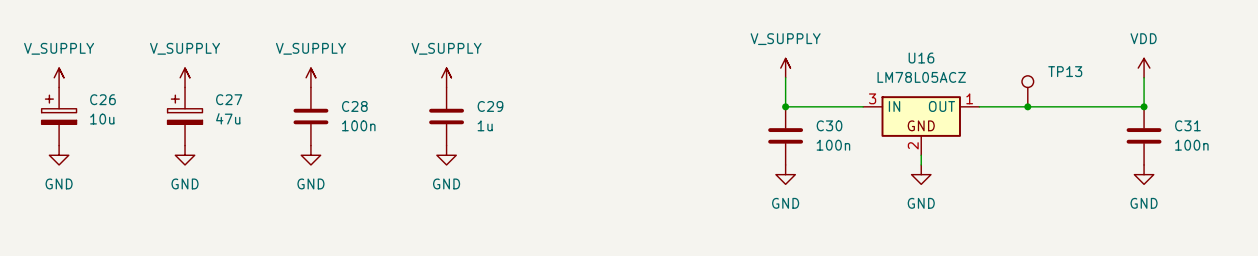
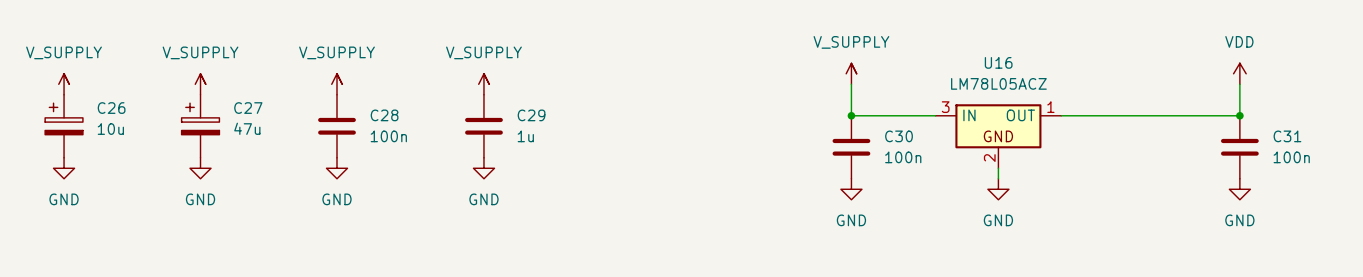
TP13: (1027, 91) -> none
junction: (1027, 106) -> none

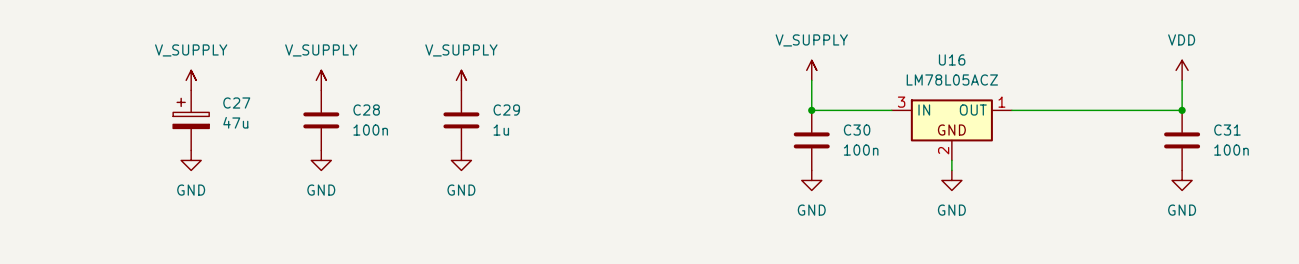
power symbol: V_SUPPLY (64, 84) -> none
C26: 10u (64, 126) -> none
power symbol: GND (64, 168) -> none

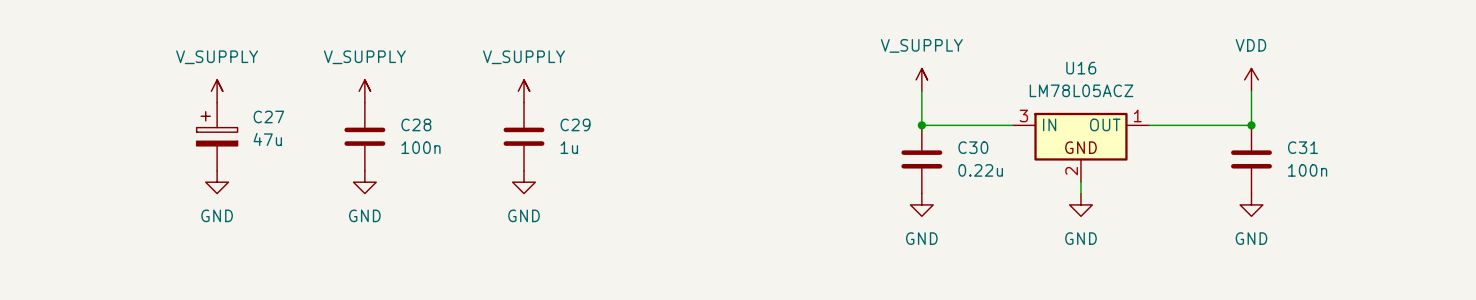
power symbol position: VDD (1182, 70) -> VDD (1251, 79)
wire: (1182, 80) (1182, 110) (1102, 110) -> (1251, 91) (1251, 125)
junction: none -> (1251, 125)
junction: (1182, 110) -> none
C31 position: (1182, 140) -> (1251, 159)
C30 value: 100n (861, 150) -> 0.22u (980, 170)
power symbol position: GND (1182, 180) -> GND (1251, 204)

